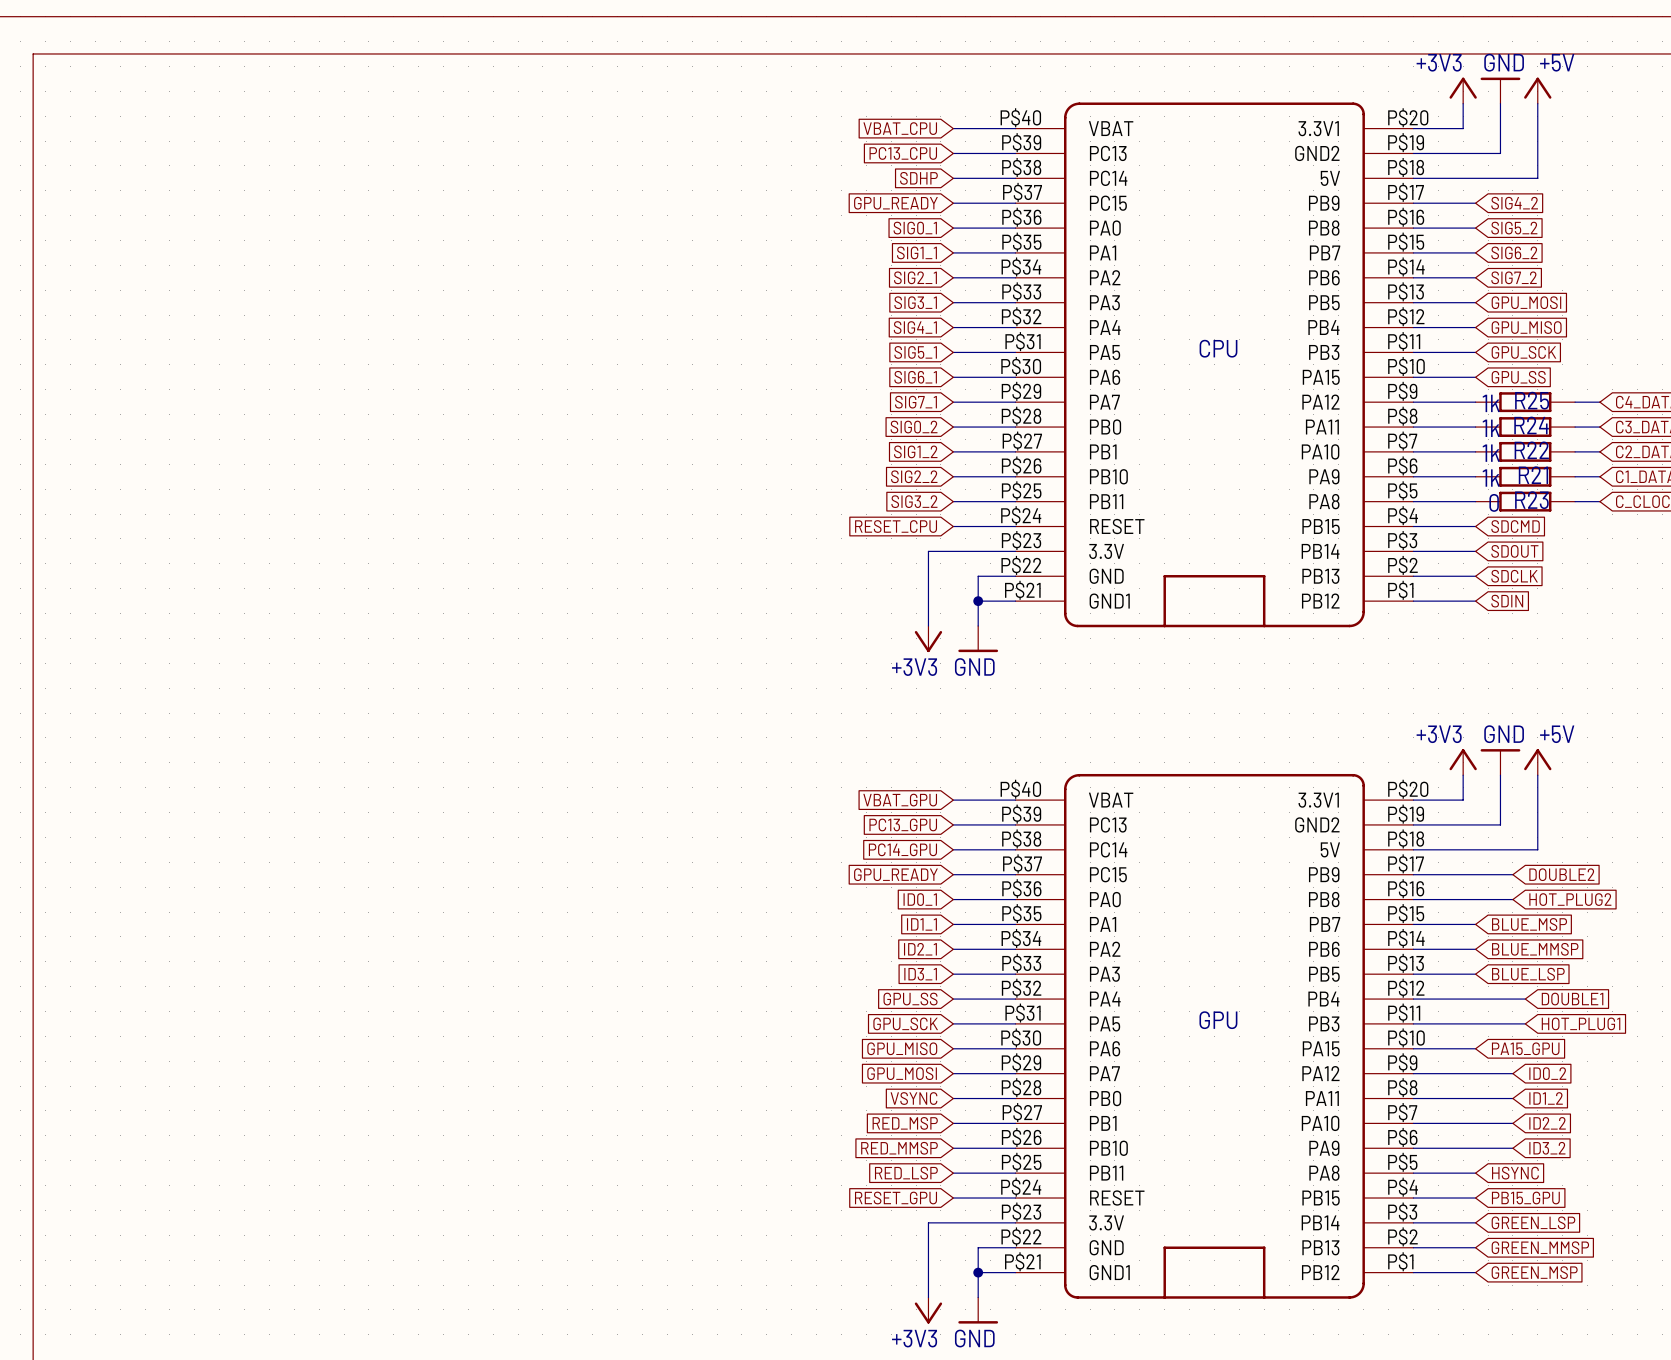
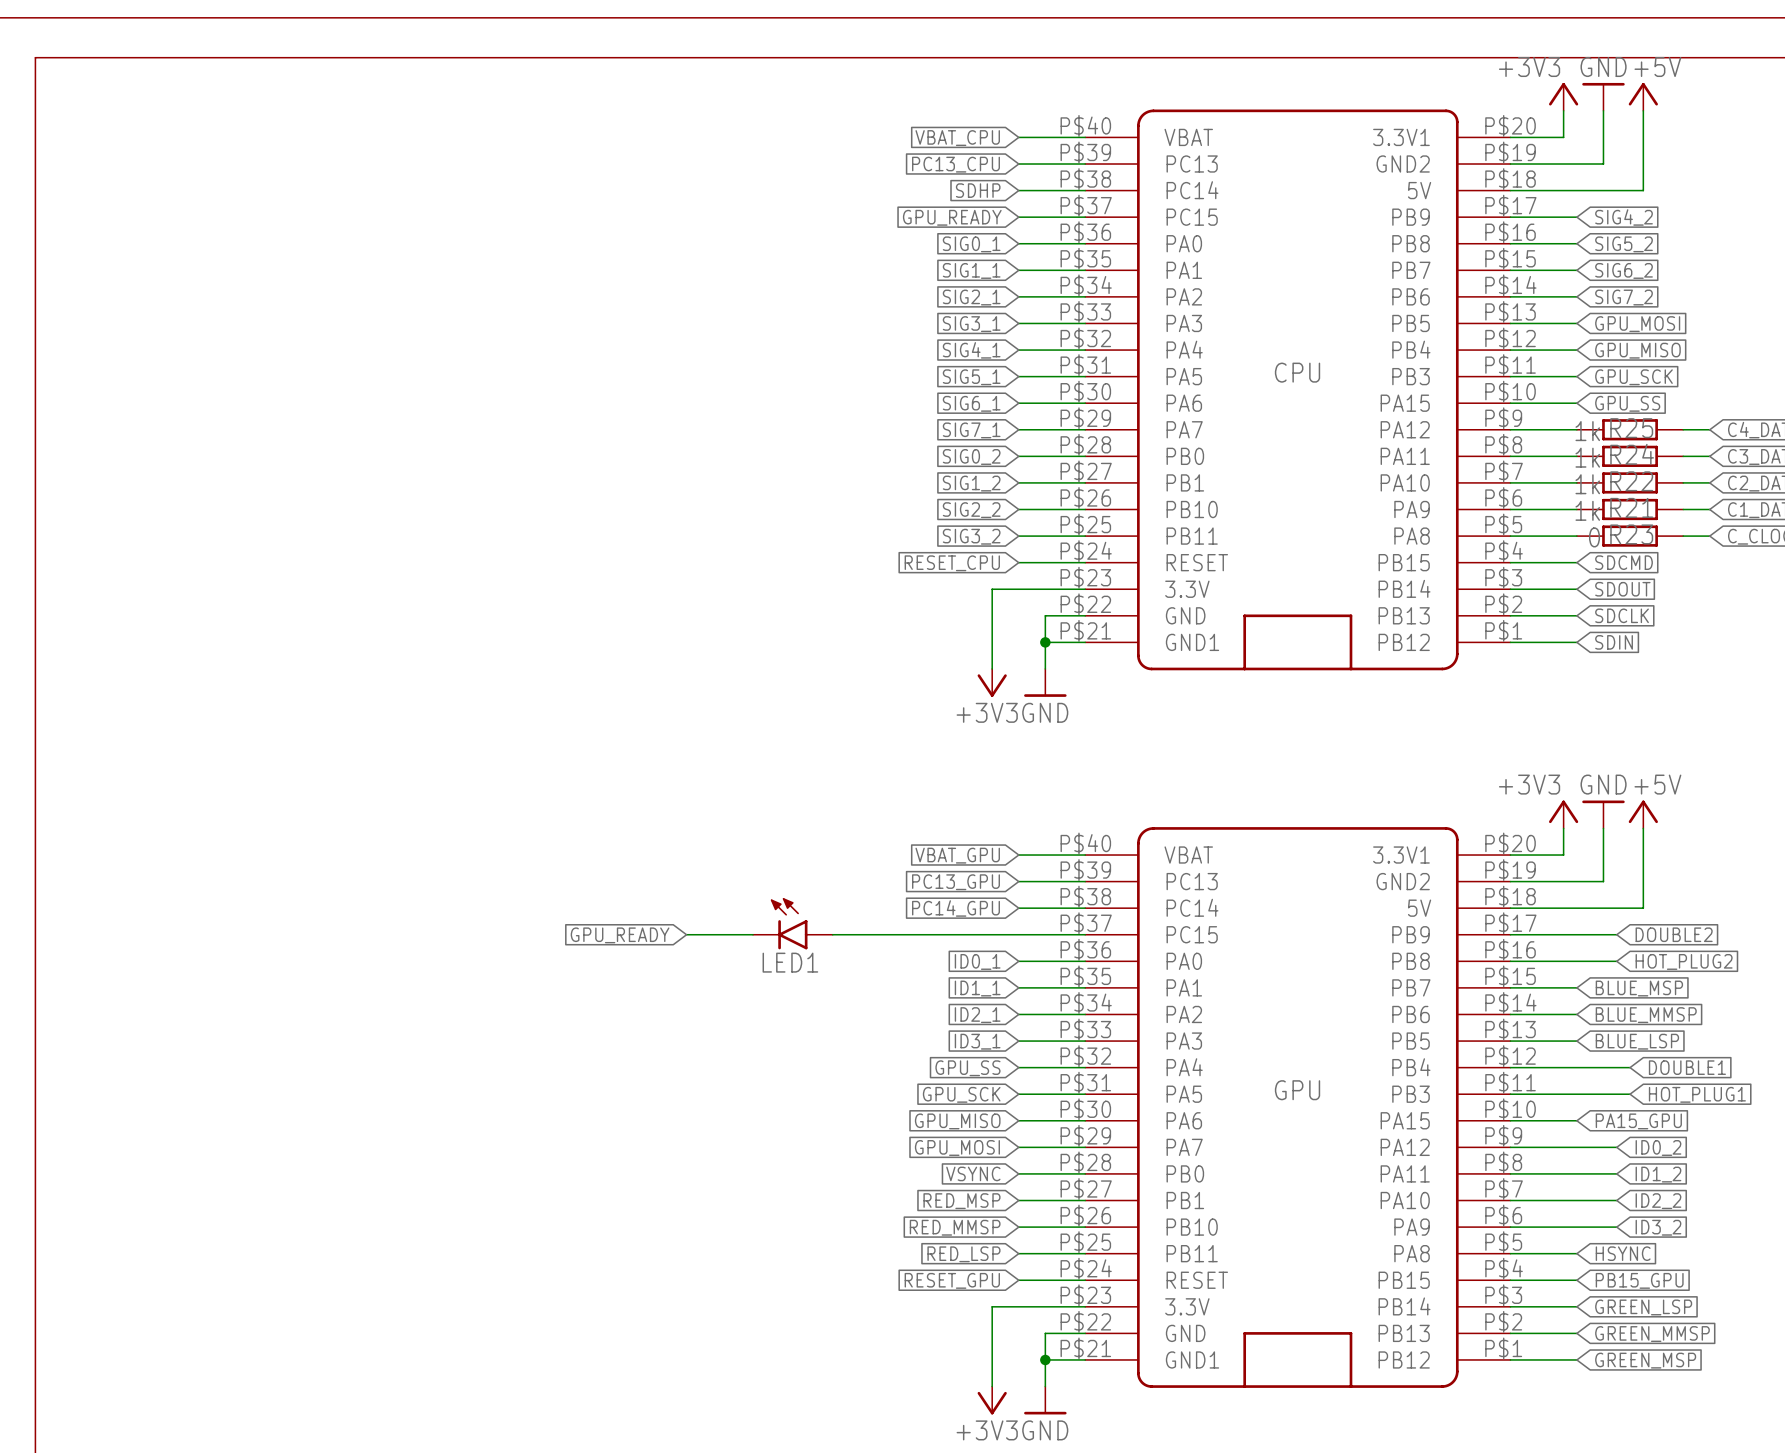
LED1: none -> (792, 923)
global label: none -> GPU_READY (620, 935)
wire: none -> (686, 934) (753, 934)
wire: none -> (832, 934) (1018, 934)
global label: GPU_READY (895, 874) -> none

